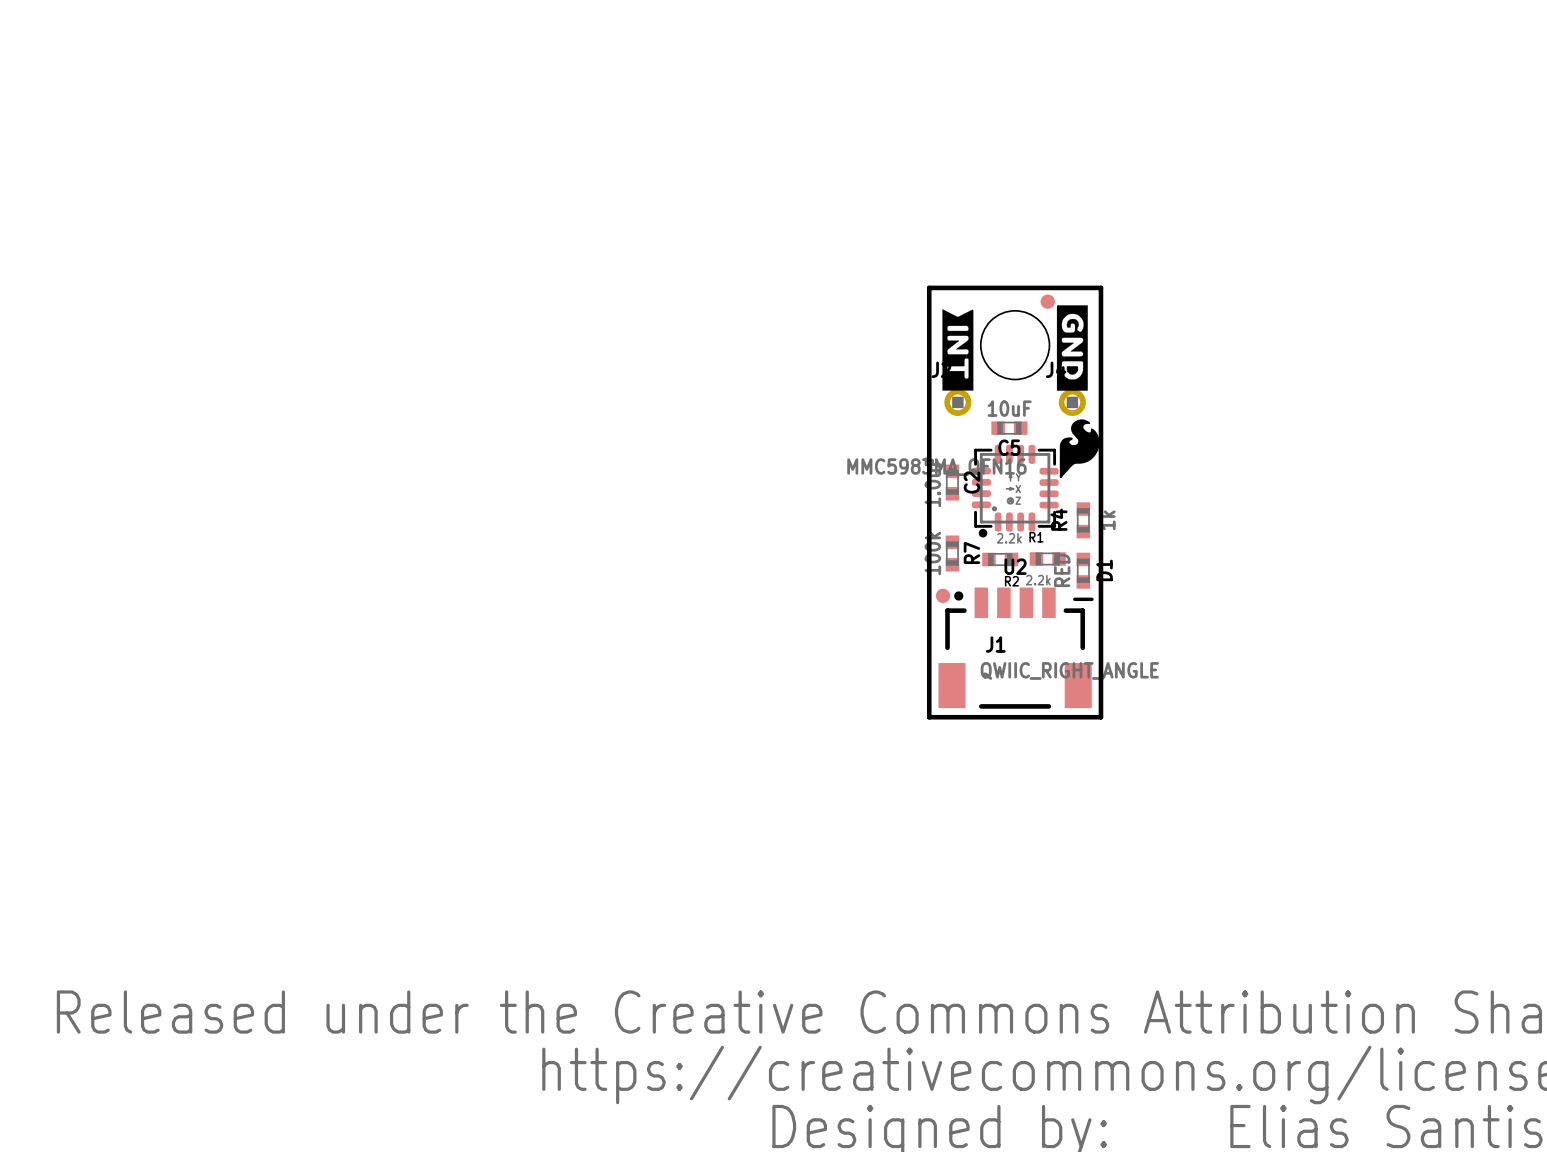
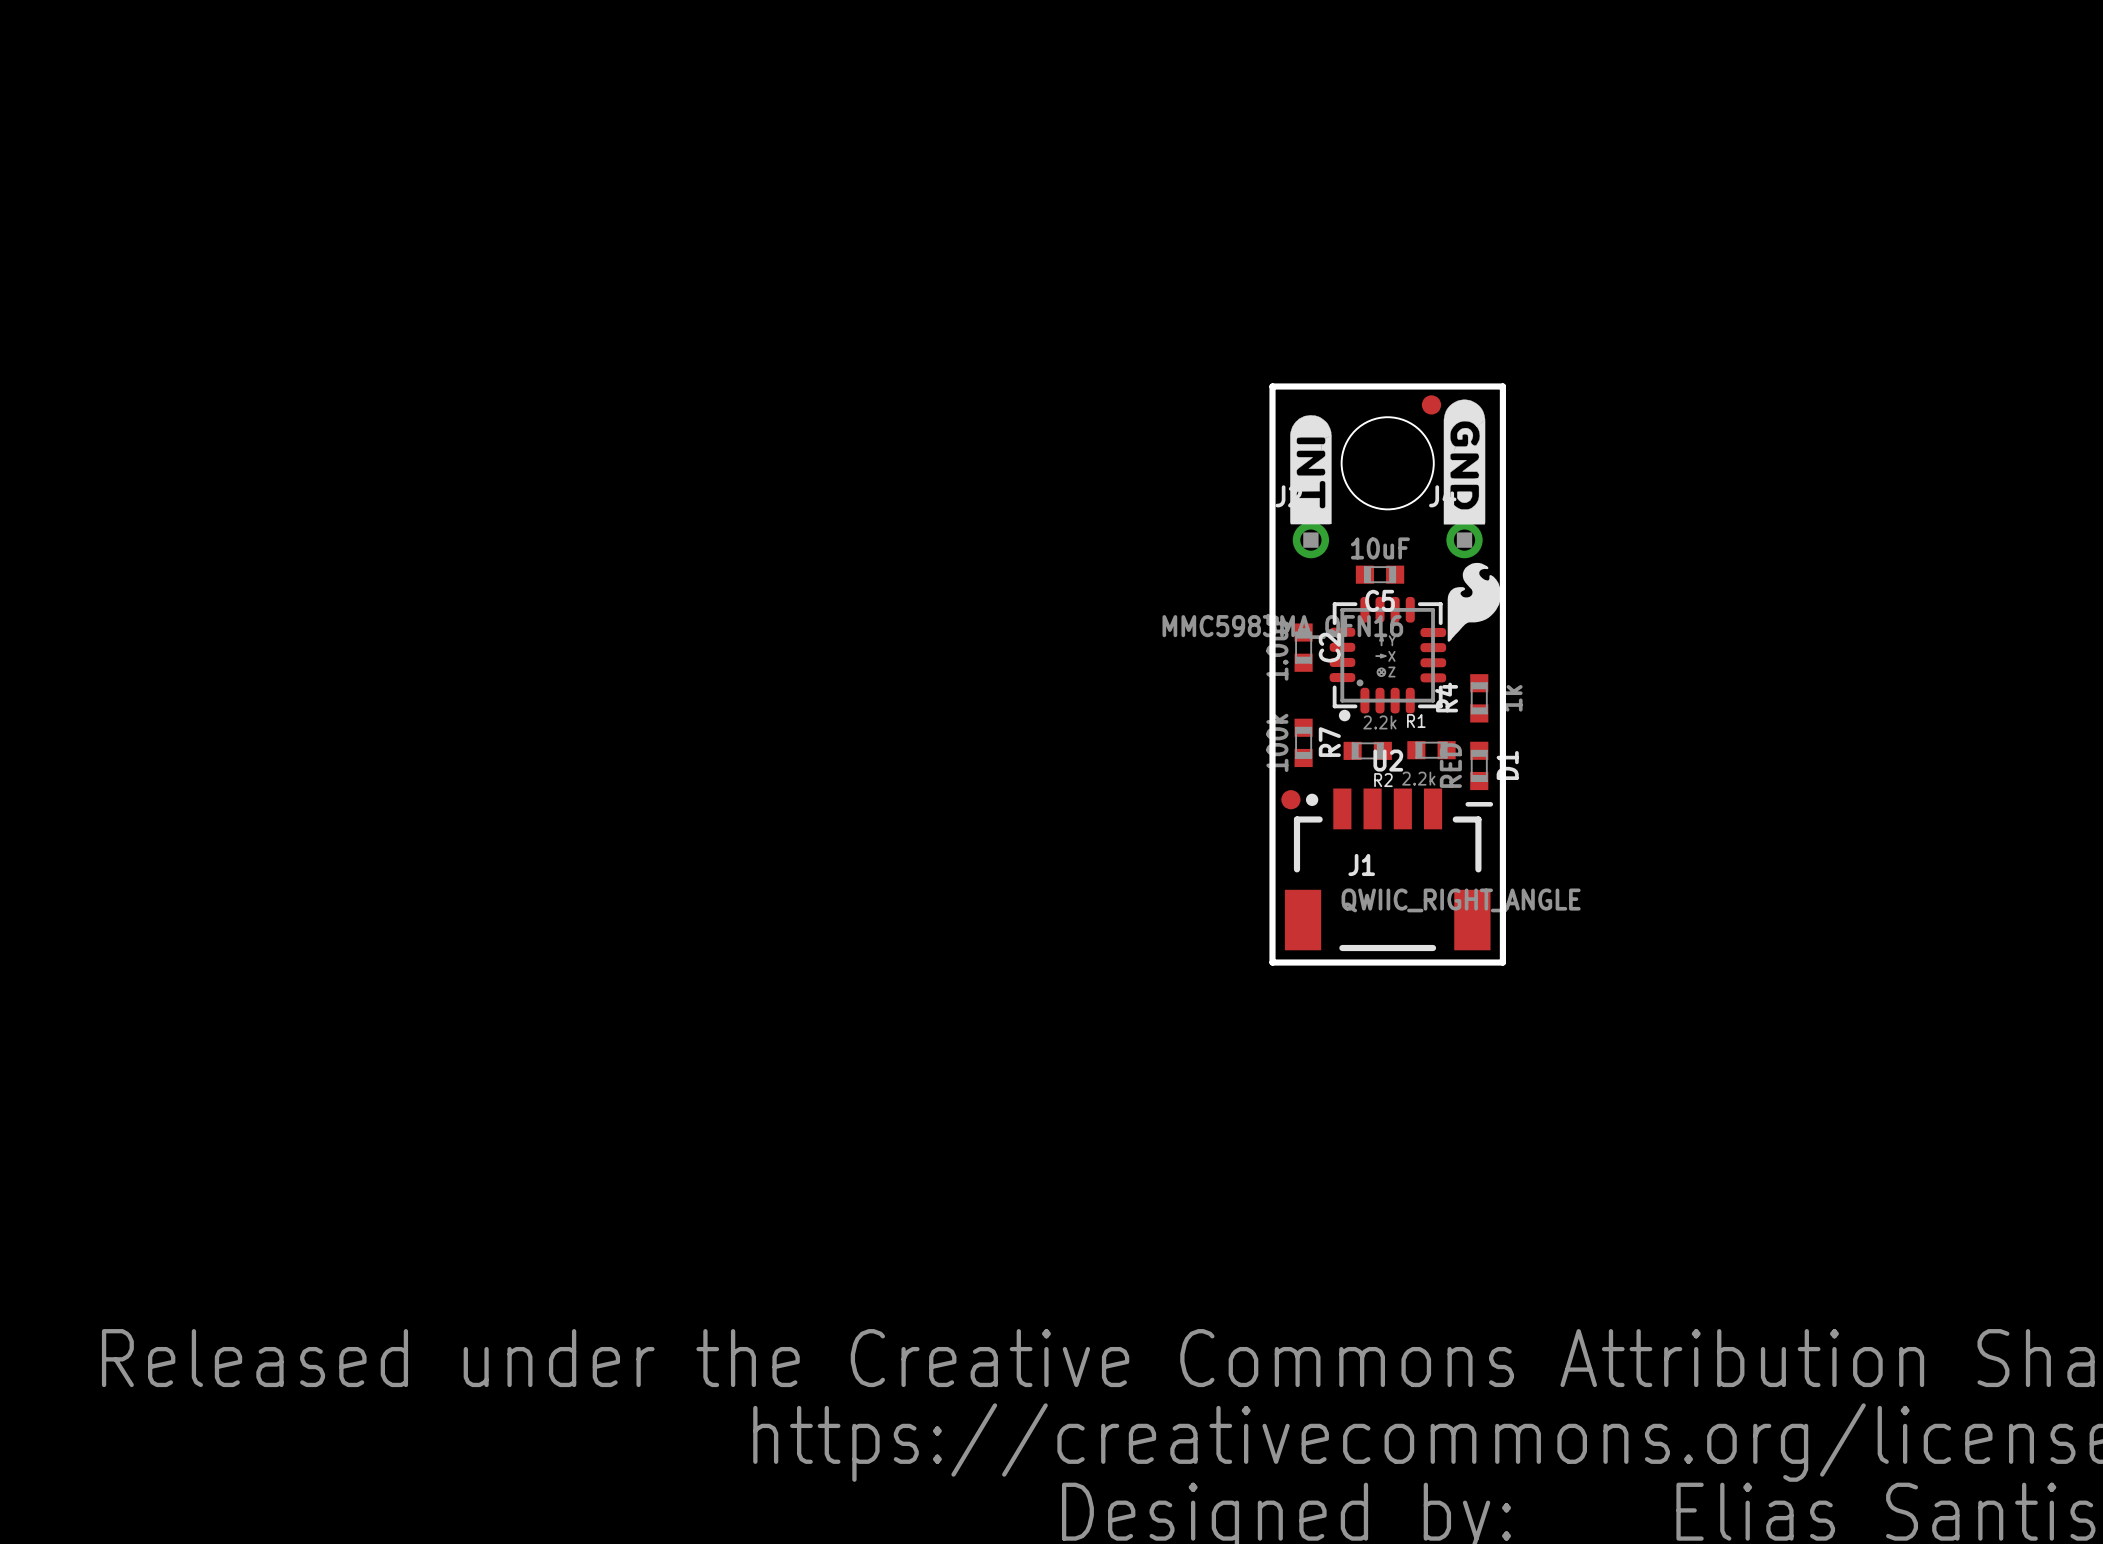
drawing shape: [1056, 305, 1088, 391] -> [1443, 399, 1486, 525]
drawing shape: [942, 309, 974, 391] -> [1290, 415, 1332, 525]

